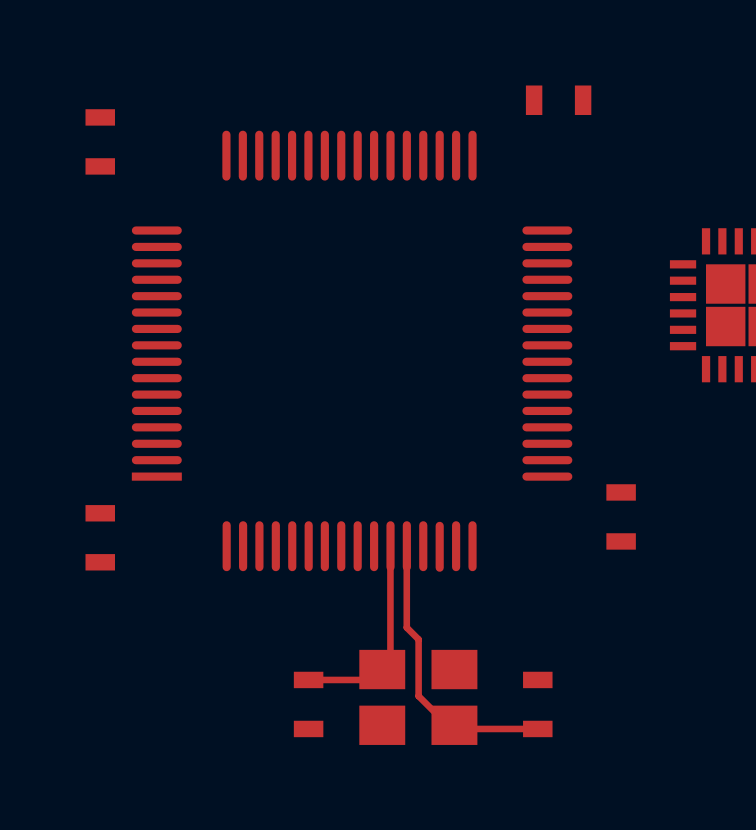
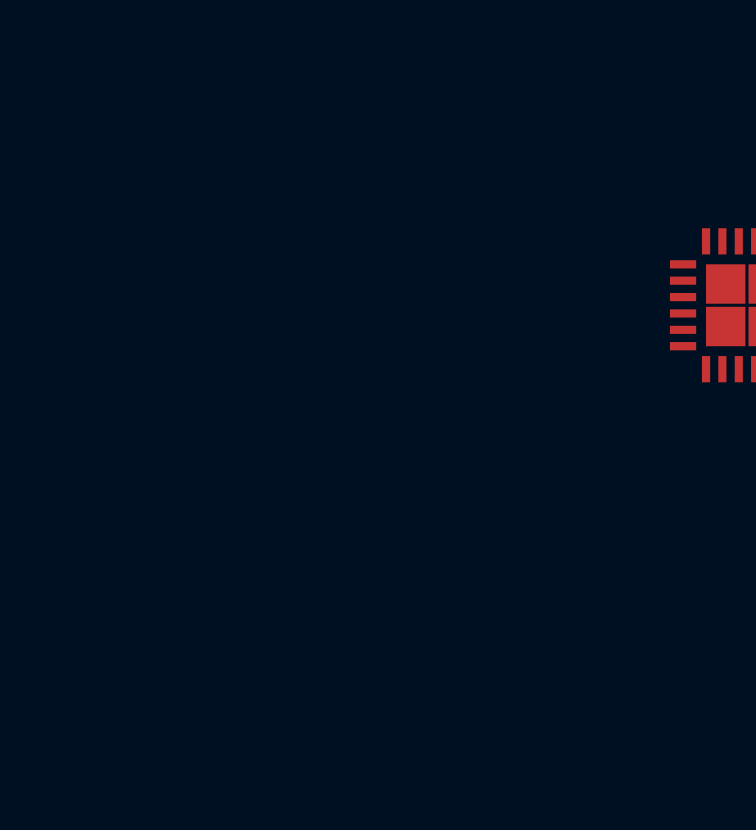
part: (558, 100) -> none
part: (100, 141) -> none
part: (352, 351) -> none
part: (621, 516) -> none
part: (100, 537) -> none
top track: (390, 546) (390, 661) (371, 679) (308, 679) -> none
top track: (406, 546) (406, 627) (418, 639) (418, 696) (447, 725) (454, 725) (458, 728) (537, 728) -> none
part: (418, 697) -> none
part: (308, 704) -> none
part: (537, 704) -> none

